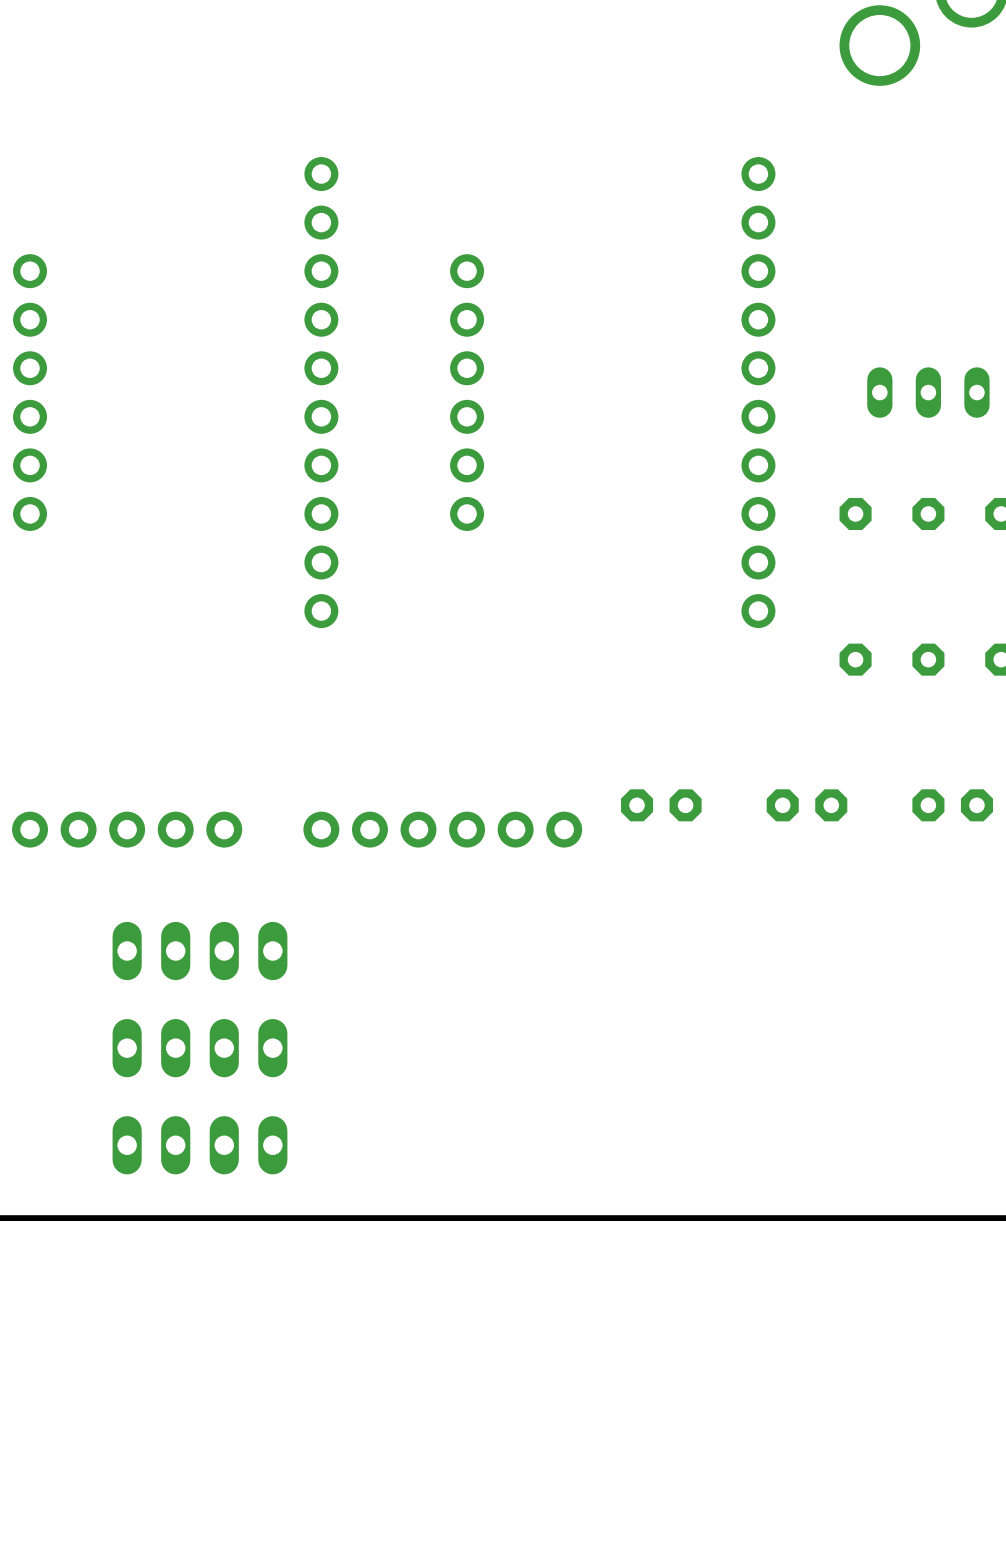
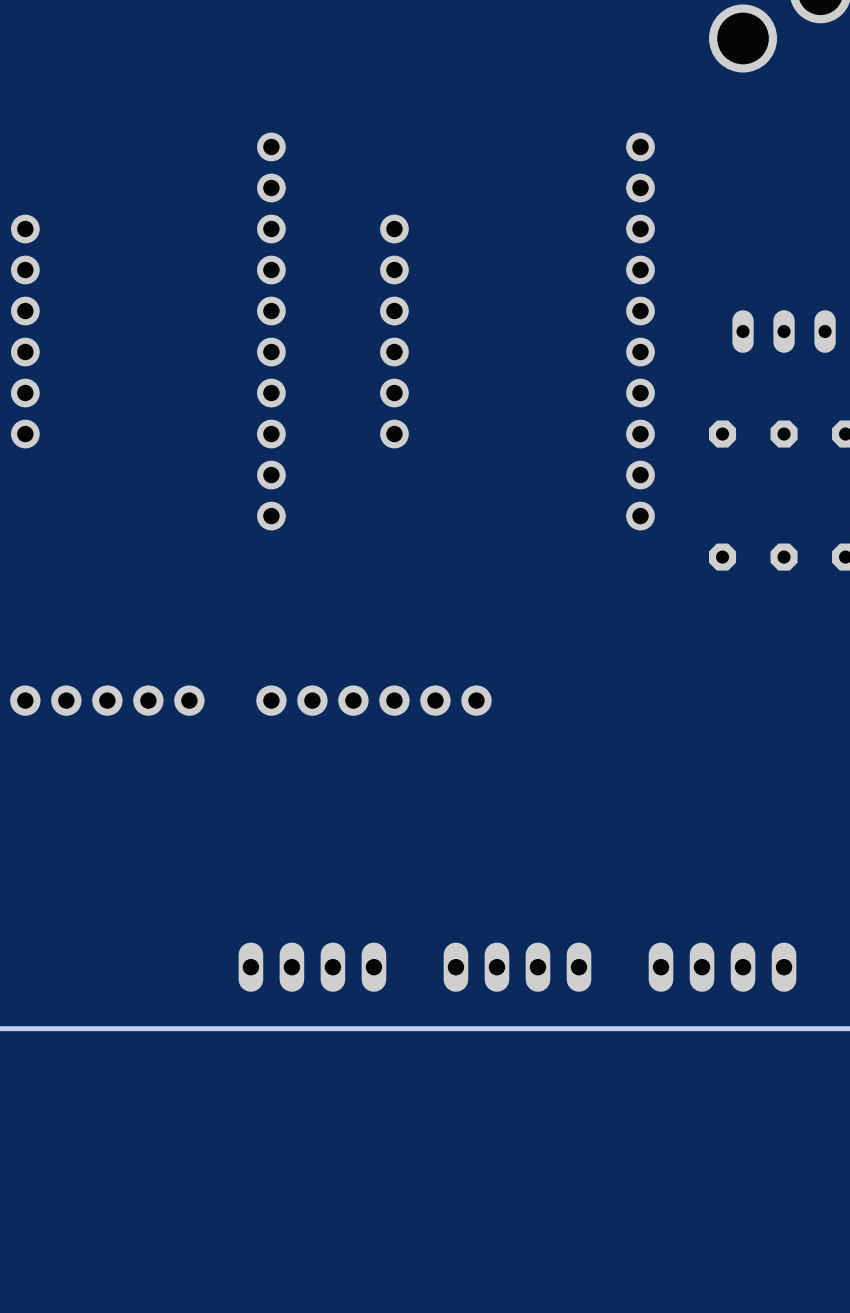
part: (661, 805) -> none
part: (807, 805) -> none
part: (952, 805) -> none
part: (199, 951) -> none
part: (199, 1048) -> none
part: (199, 1145) -> none
part: none -> (312, 967)
part: none -> (517, 967)
part: none -> (722, 967)

